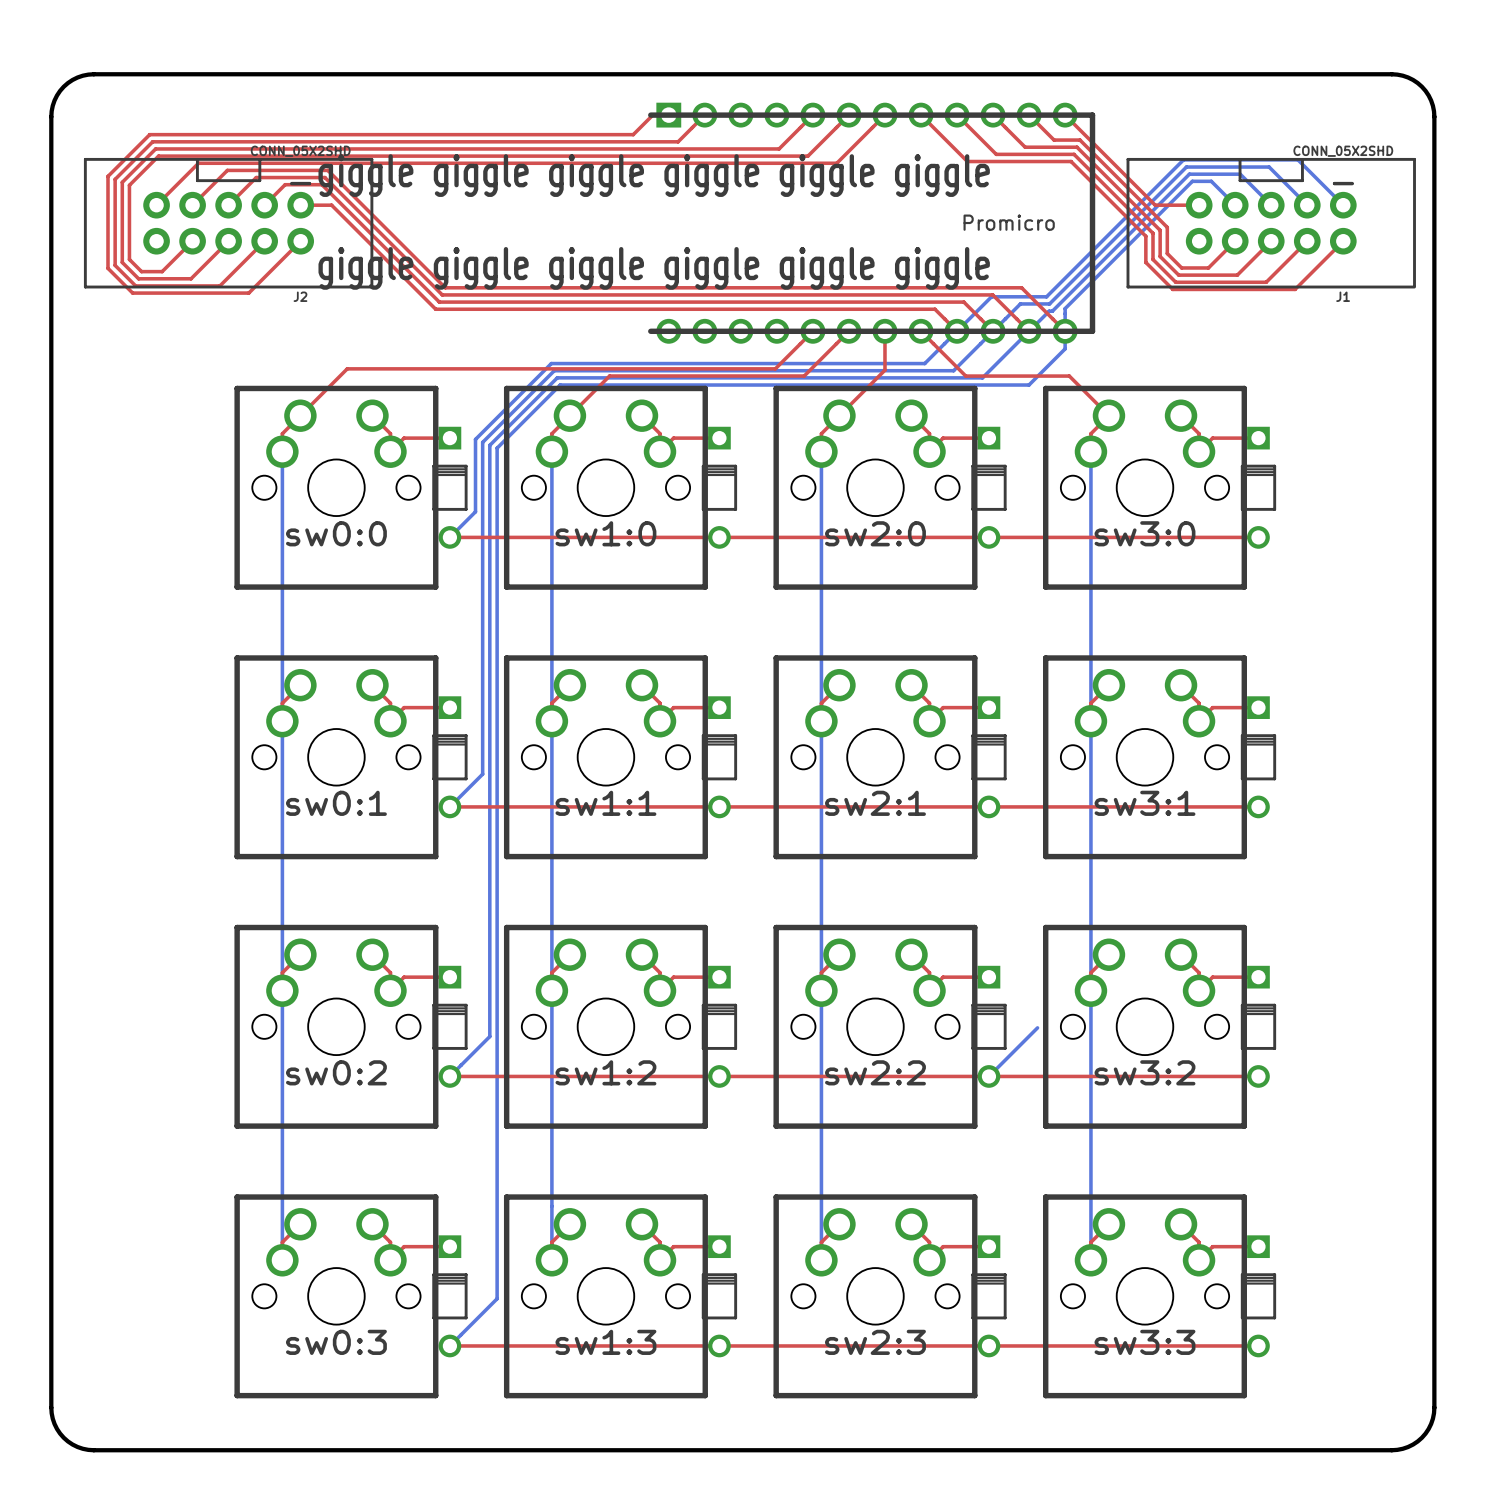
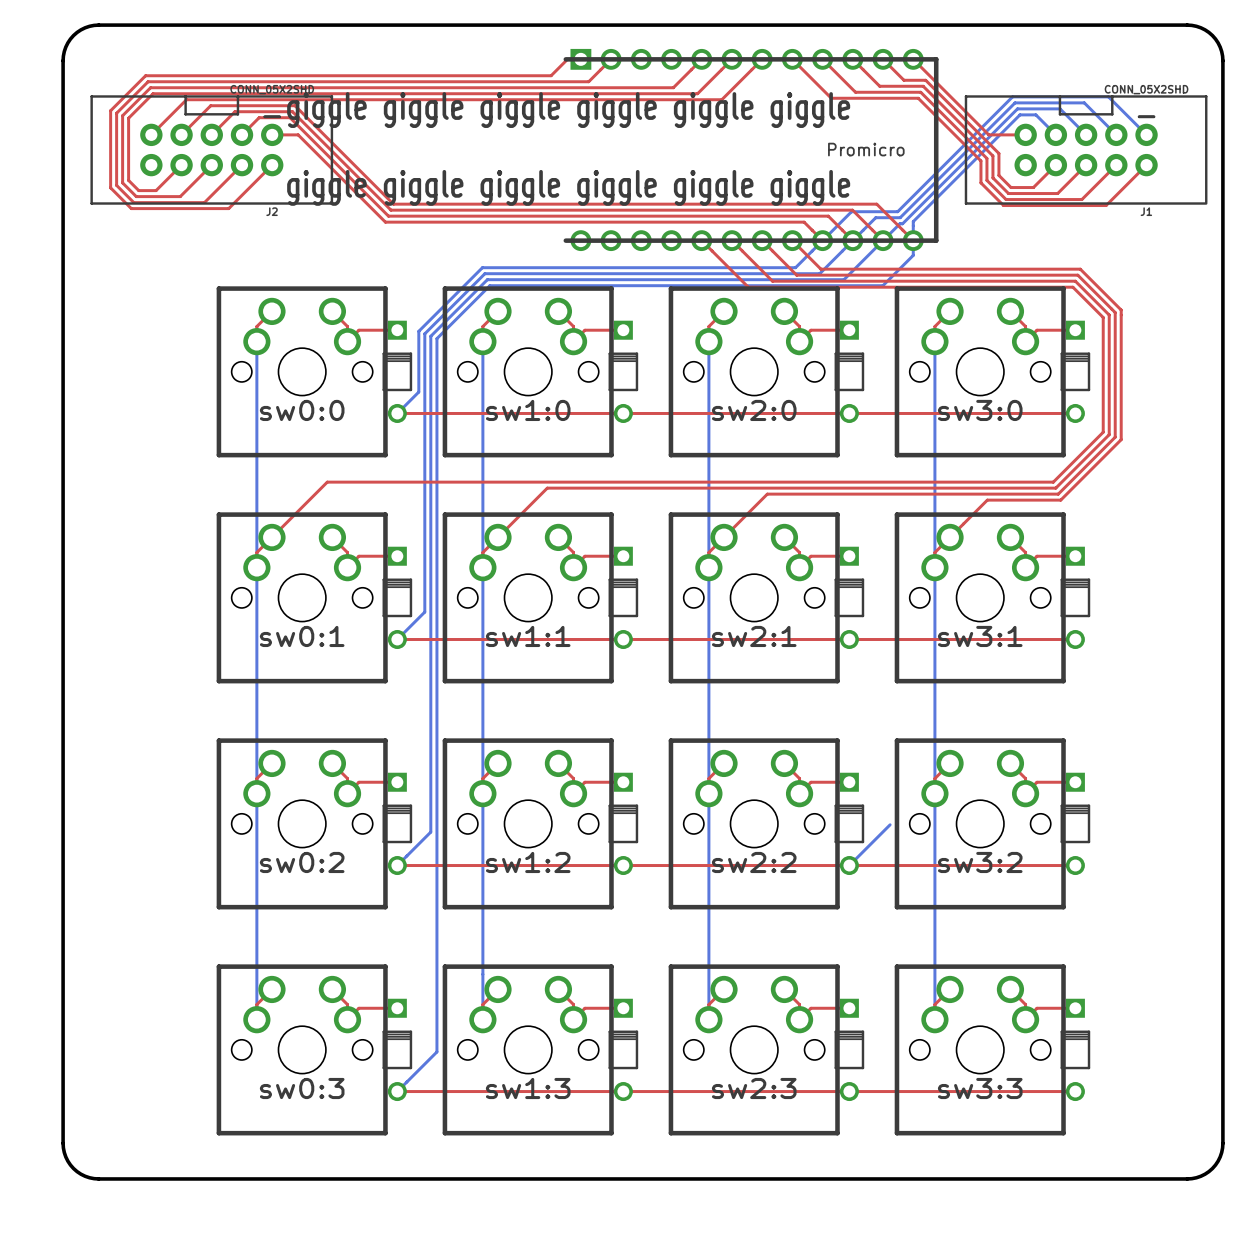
top track: (812, 331) (775, 368) (347, 368) (300, 415) -> (701, 240) (748, 287) (1072, 287) (1103, 317) (1103, 432) (1053, 482) (327, 482) (271, 537)
top track: (848, 331) (804, 376) (609, 376) (569, 415) -> (731, 240) (772, 281) (1075, 281) (1109, 315) (1109, 434) (1055, 488) (547, 488) (497, 537)
top track: (884, 331) (884, 370) (839, 415) -> (762, 240) (796, 275) (1077, 275) (1115, 312) (1115, 437) (1058, 494) (767, 494) (724, 537)
top track: (955, 365) (965, 376) (1069, 376) (1108, 415) -> (820, 269) (1080, 269) (1121, 310) (1121, 439) (1060, 500) (987, 500) (950, 537)

